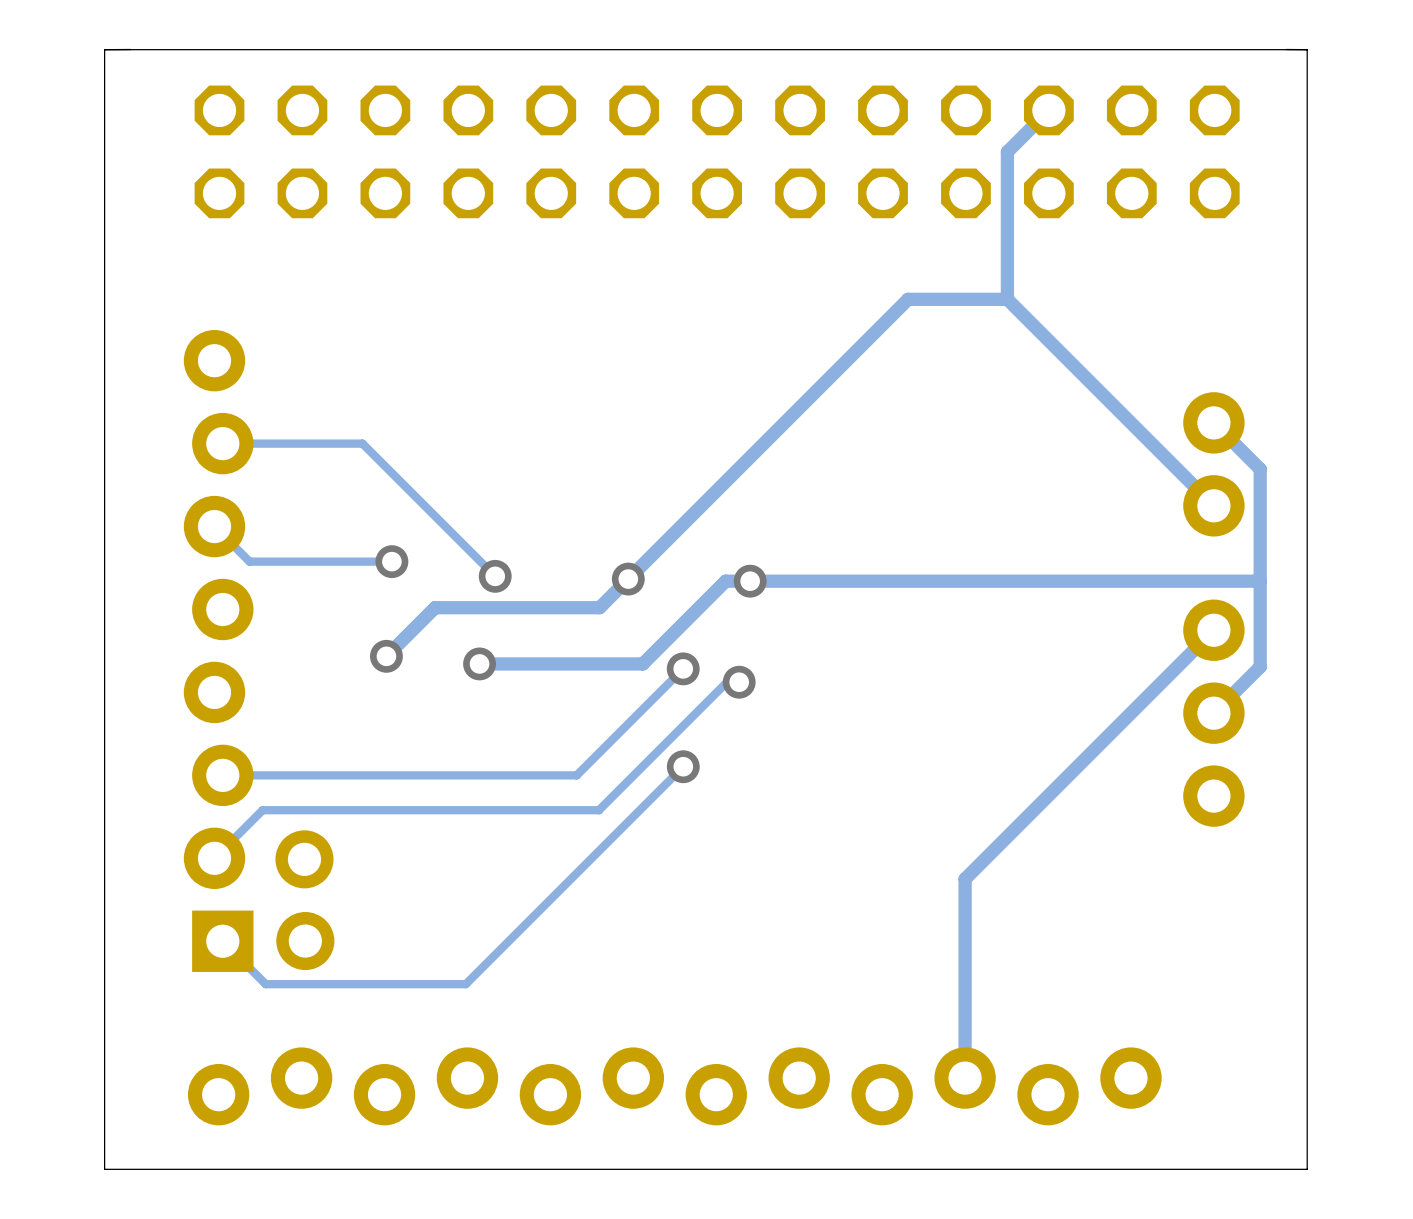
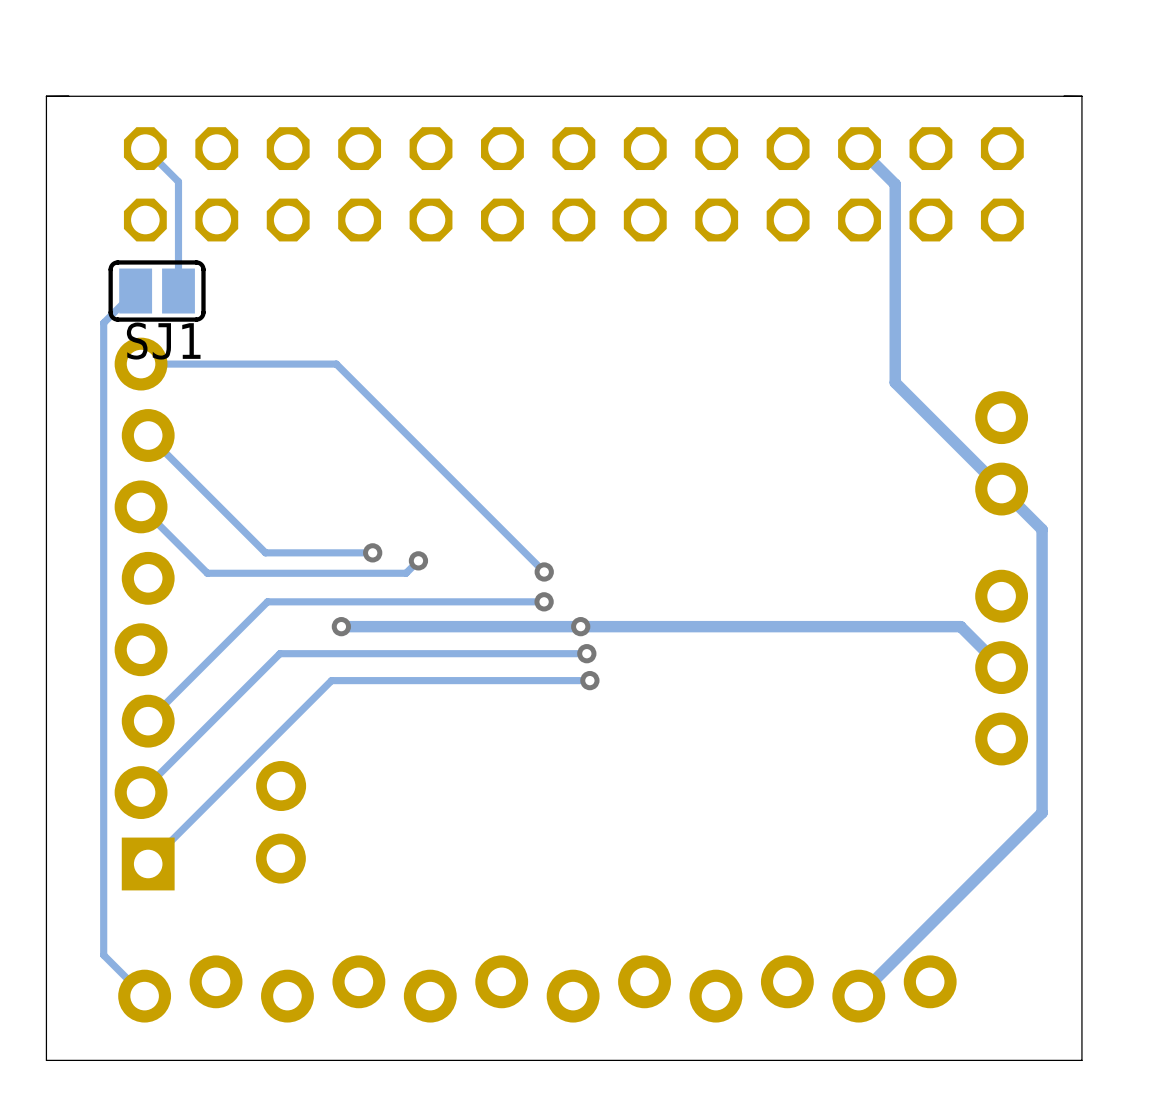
track: none -> (145, 148) (178, 181) (178, 291)
track: (1048, 110) (1007, 151) (1007, 299) -> (859, 148) (895, 184) (895, 382)
track: none -> (135, 291) (103, 322) (103, 955) (144, 996)
SJ1: none -> (157, 291)
track: (1007, 299) (1090, 382) -> none
track: (1007, 299) (908, 299) (599, 607) (435, 607) (386, 656) -> none
track: none -> (141, 364) (336, 364) (544, 571)
track: (1213, 422) (1260, 469) (1260, 666) (1213, 713) -> (341, 626) (960, 626) (1001, 667)
track: (222, 443) (362, 443) (495, 576) -> (148, 435) (265, 552) (372, 552)
track: none -> (1001, 489) (1042, 529) (1042, 812) (858, 996)
via size: [478, 559, 512, 593] -> [363, 543, 383, 563]
track: (391, 561) (249, 561) -> (418, 560) (406, 573) (207, 573) (171, 537)
via: (391, 561) -> none
via: (628, 579) -> none
via: (750, 581) -> none
track: (1260, 581) (725, 581) (642, 663) (479, 663) -> none
via: none -> (418, 560)
via: none -> (544, 571)
track: (1213, 630) (965, 879) (965, 1078) -> none
via: none -> (544, 601)
via: (386, 656) -> none
via: (479, 663) -> none
via: none -> (341, 626)
via: none -> (580, 626)
track: (683, 668) (576, 775) (222, 775) -> (544, 601) (267, 601) (148, 721)
via: (683, 668) -> none
track: (739, 682) (726, 682) (598, 810) (262, 810) -> (586, 653) (279, 653) (182, 751)
via: (739, 682) -> none
via: none -> (586, 653)
via: none -> (589, 680)
track: (683, 766) (465, 984) (265, 984) (222, 941) -> (589, 680) (331, 680) (148, 863)
via: (683, 766) -> none
part: none -> (281, 786)
part: (304, 859) -> none
part: none -> (280, 858)
part: (305, 941) -> none

